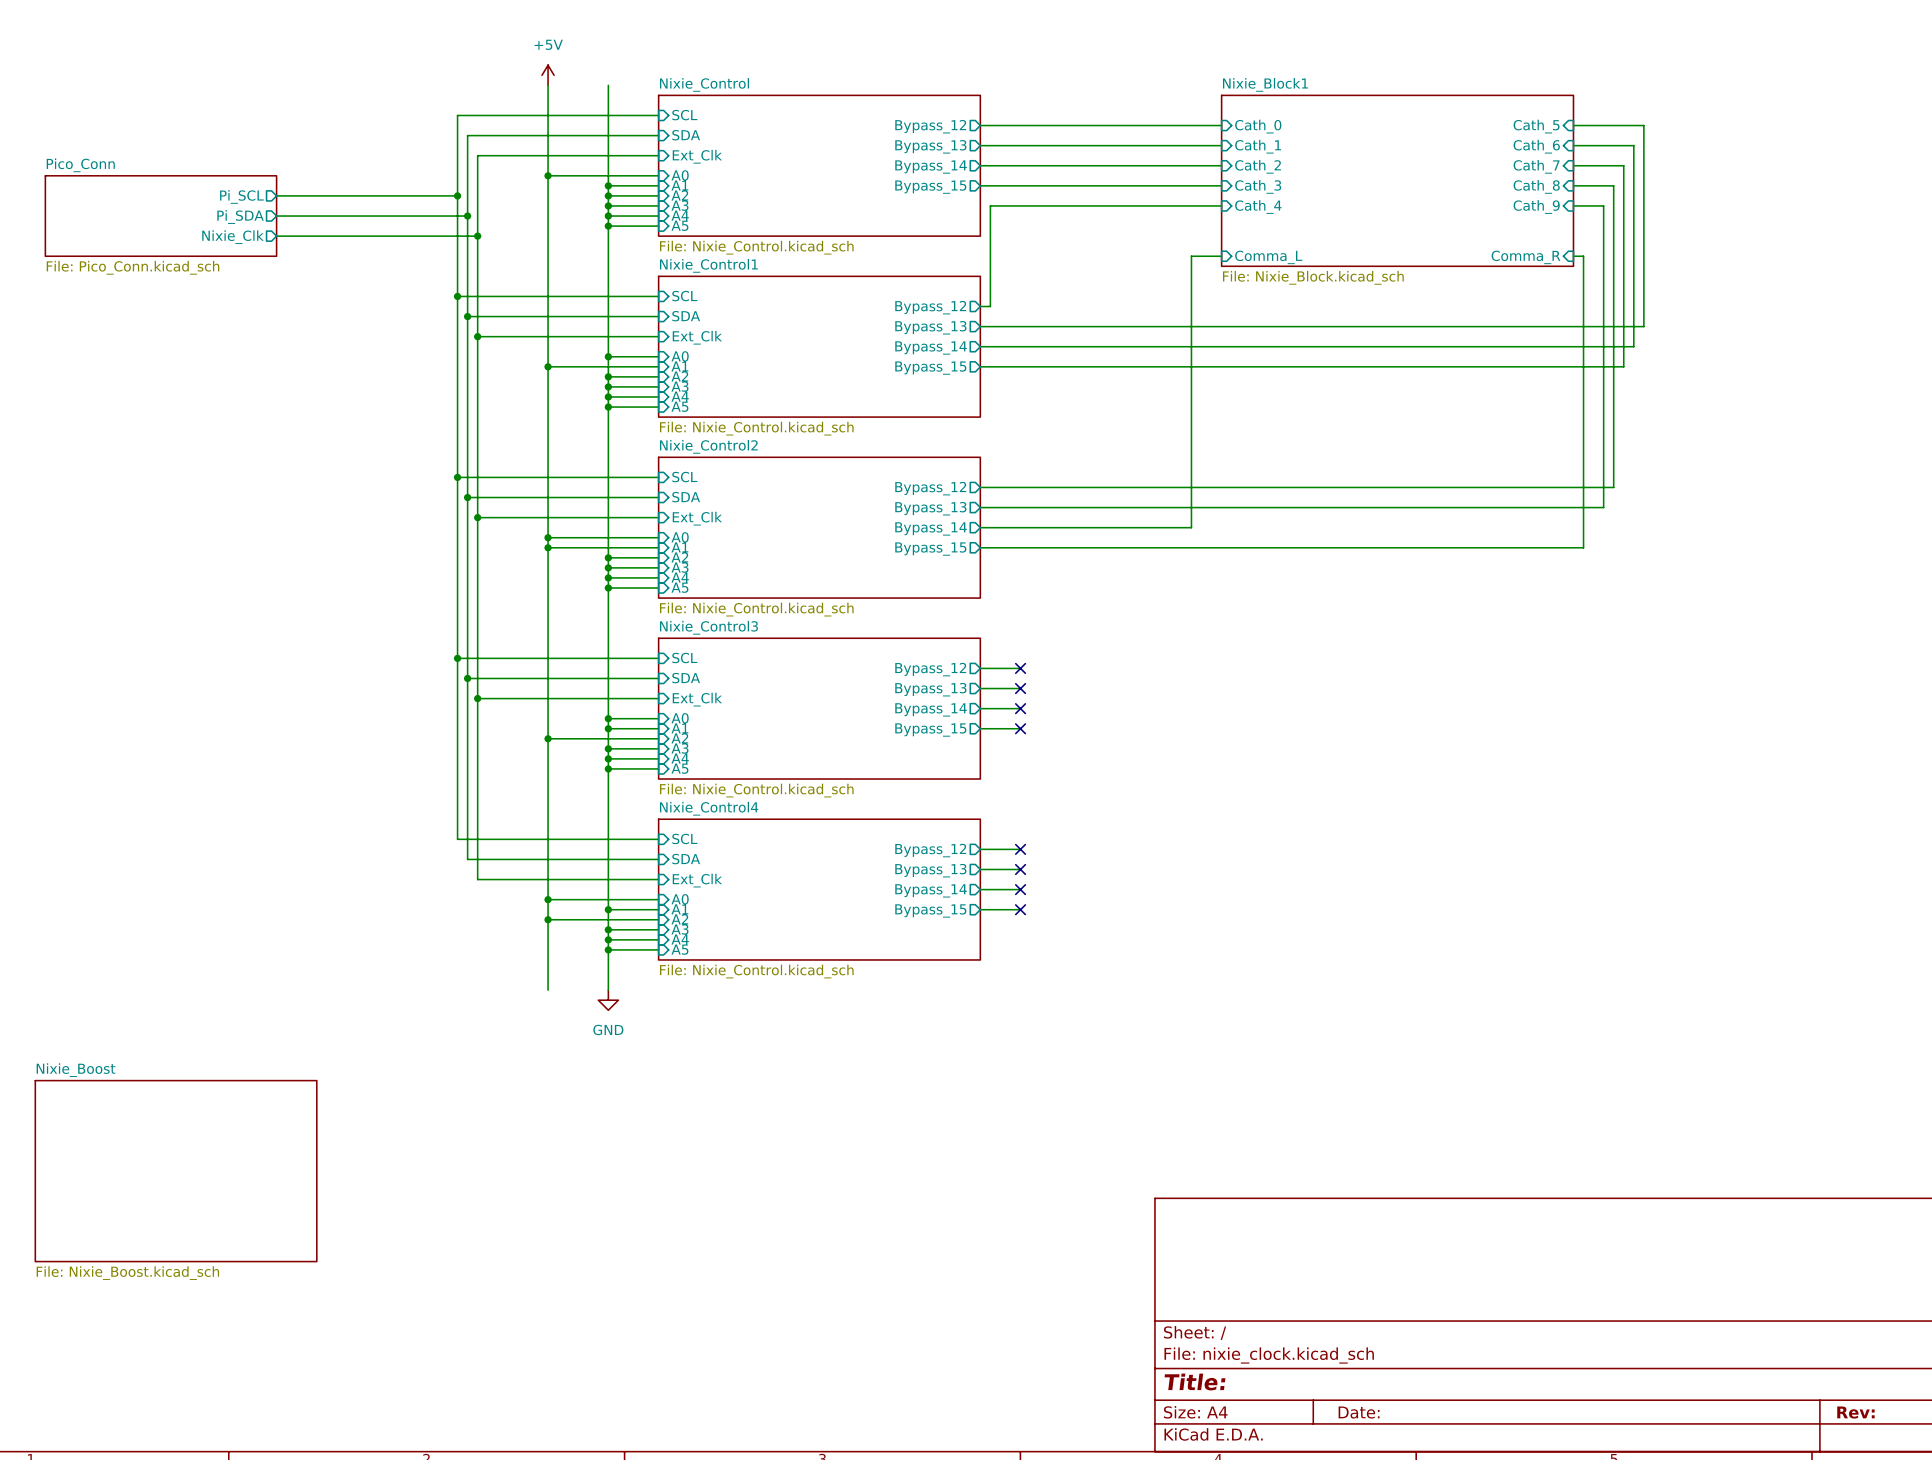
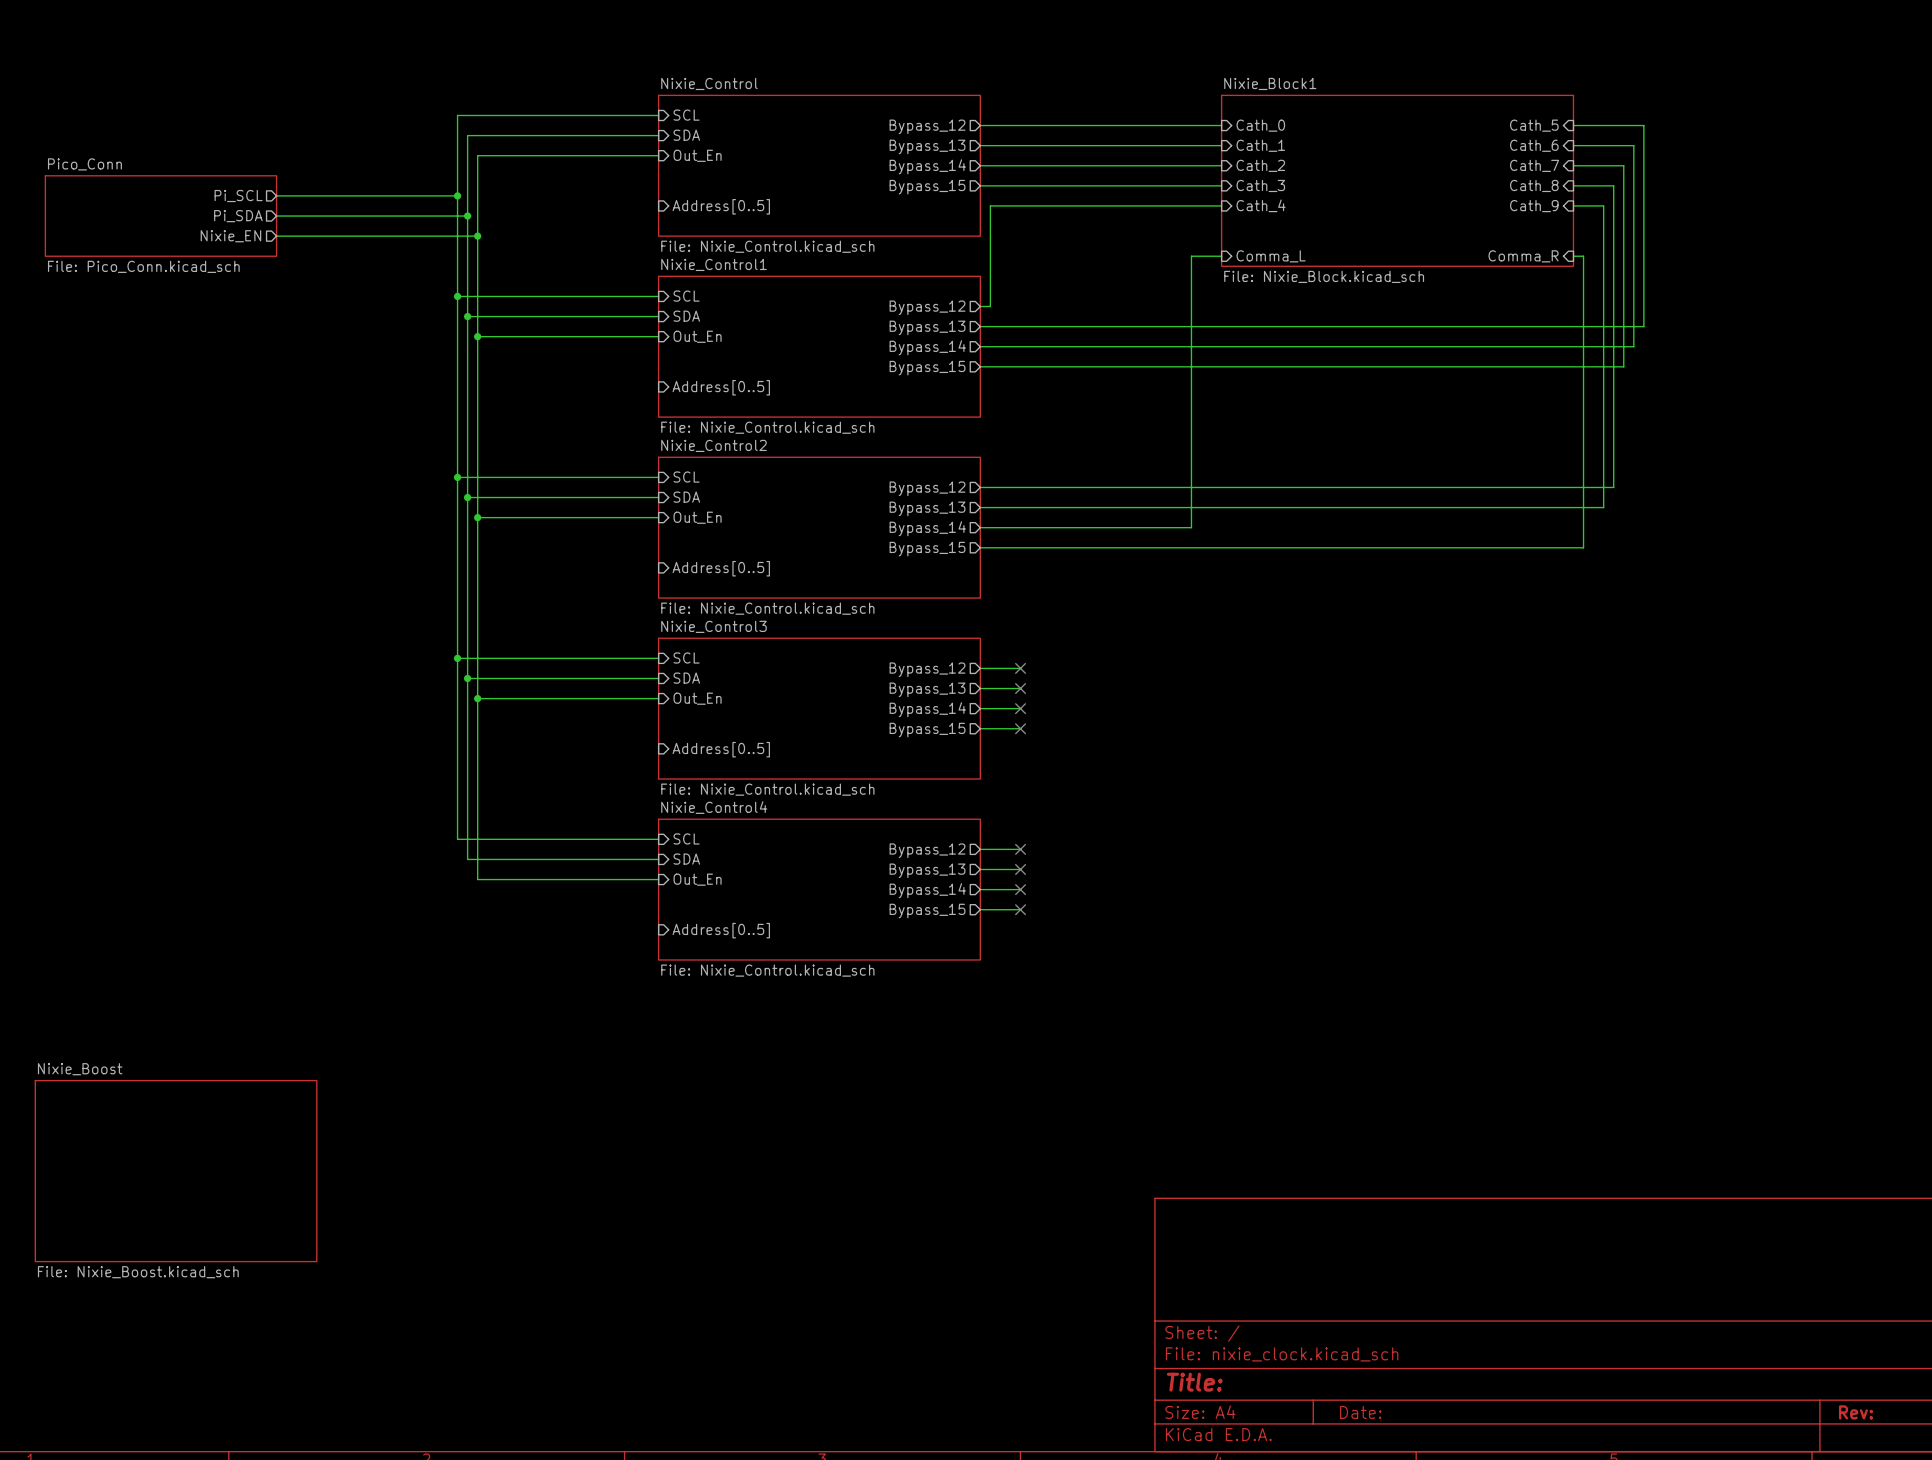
power symbol: +5V (548, 75) -> none
wire: (548, 85) (548, 990) -> none
wire: (608, 85) (608, 990) -> none
sheet pin: Ext_Clk (697, 156) -> Out_En (697, 155)
wire: (548, 175) (658, 175) -> none
junction: (548, 175) -> none
sheet pin: A0 (680, 175) -> none
wire: (608, 185) (658, 185) -> none
junction: (608, 185) -> none
sheet pin: A1 (679, 185) -> none
wire: (608, 195) (658, 195) -> none
junction: (608, 195) -> none
sheet pin: A2 (679, 195) -> none
wire: (608, 205) (658, 205) -> none
junction: (608, 205) -> none
sheet pin: A3 (680, 205) -> Address[0..5] (721, 206)
sheet pin: A4 (680, 215) -> none
wire: (608, 216) (658, 216) -> none
junction: (608, 216) -> none
sheet pin: A5 (679, 225) -> none
wire: (608, 226) (658, 226) -> none
junction: (608, 226) -> none
sheet pin: Nixie_Clk (233, 237) -> Nixie_EN (230, 236)
sheet pin: Ext_Clk (697, 337) -> Out_En (697, 336)
wire: (608, 356) (658, 356) -> none
junction: (608, 356) -> none
sheet pin: A0 (680, 356) -> none
wire: (548, 366) (658, 366) -> none
junction: (548, 366) -> none
sheet pin: A1 (679, 366) -> none
wire: (608, 376) (658, 376) -> none
junction: (608, 376) -> none
sheet pin: A2 (679, 376) -> none
wire: (608, 386) (658, 386) -> none
junction: (608, 386) -> none
sheet pin: A3 (680, 386) -> Address[0..5] (721, 387)
wire: (608, 396) (658, 396) -> none
junction: (608, 396) -> none
sheet pin: A4 (680, 396) -> none
sheet pin: A5 (679, 406) -> none
wire: (608, 407) (658, 407) -> none
junction: (608, 407) -> none
sheet pin: Ext_Clk (697, 518) -> Out_En (697, 517)
wire: (548, 537) (658, 537) -> none
junction: (548, 537) -> none
sheet pin: A0 (680, 537) -> none
wire: (548, 547) (658, 547) -> none
junction: (548, 547) -> none
sheet pin: A1 (679, 547) -> none
wire: (608, 557) (658, 557) -> none
junction: (608, 557) -> none
sheet pin: A2 (679, 557) -> none
wire: (608, 567) (658, 567) -> none
junction: (608, 567) -> none
sheet pin: A3 (680, 567) -> Address[0..5] (721, 568)
wire: (608, 577) (658, 577) -> none
junction: (608, 577) -> none
sheet pin: A4 (680, 577) -> none
sheet pin: A5 (679, 587) -> none
wire: (608, 588) (658, 588) -> none
junction: (608, 588) -> none
sheet pin: Ext_Clk (697, 699) -> Out_En (697, 698)
wire: (608, 718) (658, 718) -> none
junction: (608, 718) -> none
sheet pin: A0 (680, 718) -> none
wire: (608, 728) (658, 728) -> none
junction: (608, 728) -> none
sheet pin: A1 (679, 728) -> none
wire: (548, 738) (658, 738) -> none
junction: (548, 738) -> none
sheet pin: A2 (679, 738) -> none
wire: (608, 748) (658, 748) -> none
junction: (608, 748) -> none
sheet pin: A3 (680, 748) -> Address[0..5] (721, 749)
wire: (608, 758) (658, 758) -> none
junction: (608, 758) -> none
sheet pin: A4 (680, 758) -> none
wire: (608, 768) (658, 768) -> none
junction: (608, 768) -> none
sheet pin: A5 (679, 768) -> none
sheet pin: Ext_Clk (697, 880) -> Out_En (697, 879)
wire: (548, 899) (658, 899) -> none
junction: (548, 899) -> none
sheet pin: A0 (680, 899) -> none
wire: (608, 909) (658, 909) -> none
junction: (608, 909) -> none
sheet pin: A1 (679, 909) -> none
wire: (548, 919) (658, 919) -> none
junction: (548, 919) -> none
sheet pin: A2 (679, 919) -> none
wire: (608, 929) (658, 929) -> none
junction: (608, 929) -> none
sheet pin: A3 (680, 929) -> Address[0..5] (721, 930)
wire: (608, 939) (658, 939) -> none
junction: (608, 939) -> none
sheet pin: A4 (680, 939) -> none
wire: (608, 949) (658, 949) -> none
junction: (608, 949) -> none
sheet pin: A5 (679, 949) -> none
power symbol: GND (608, 1000) -> none

